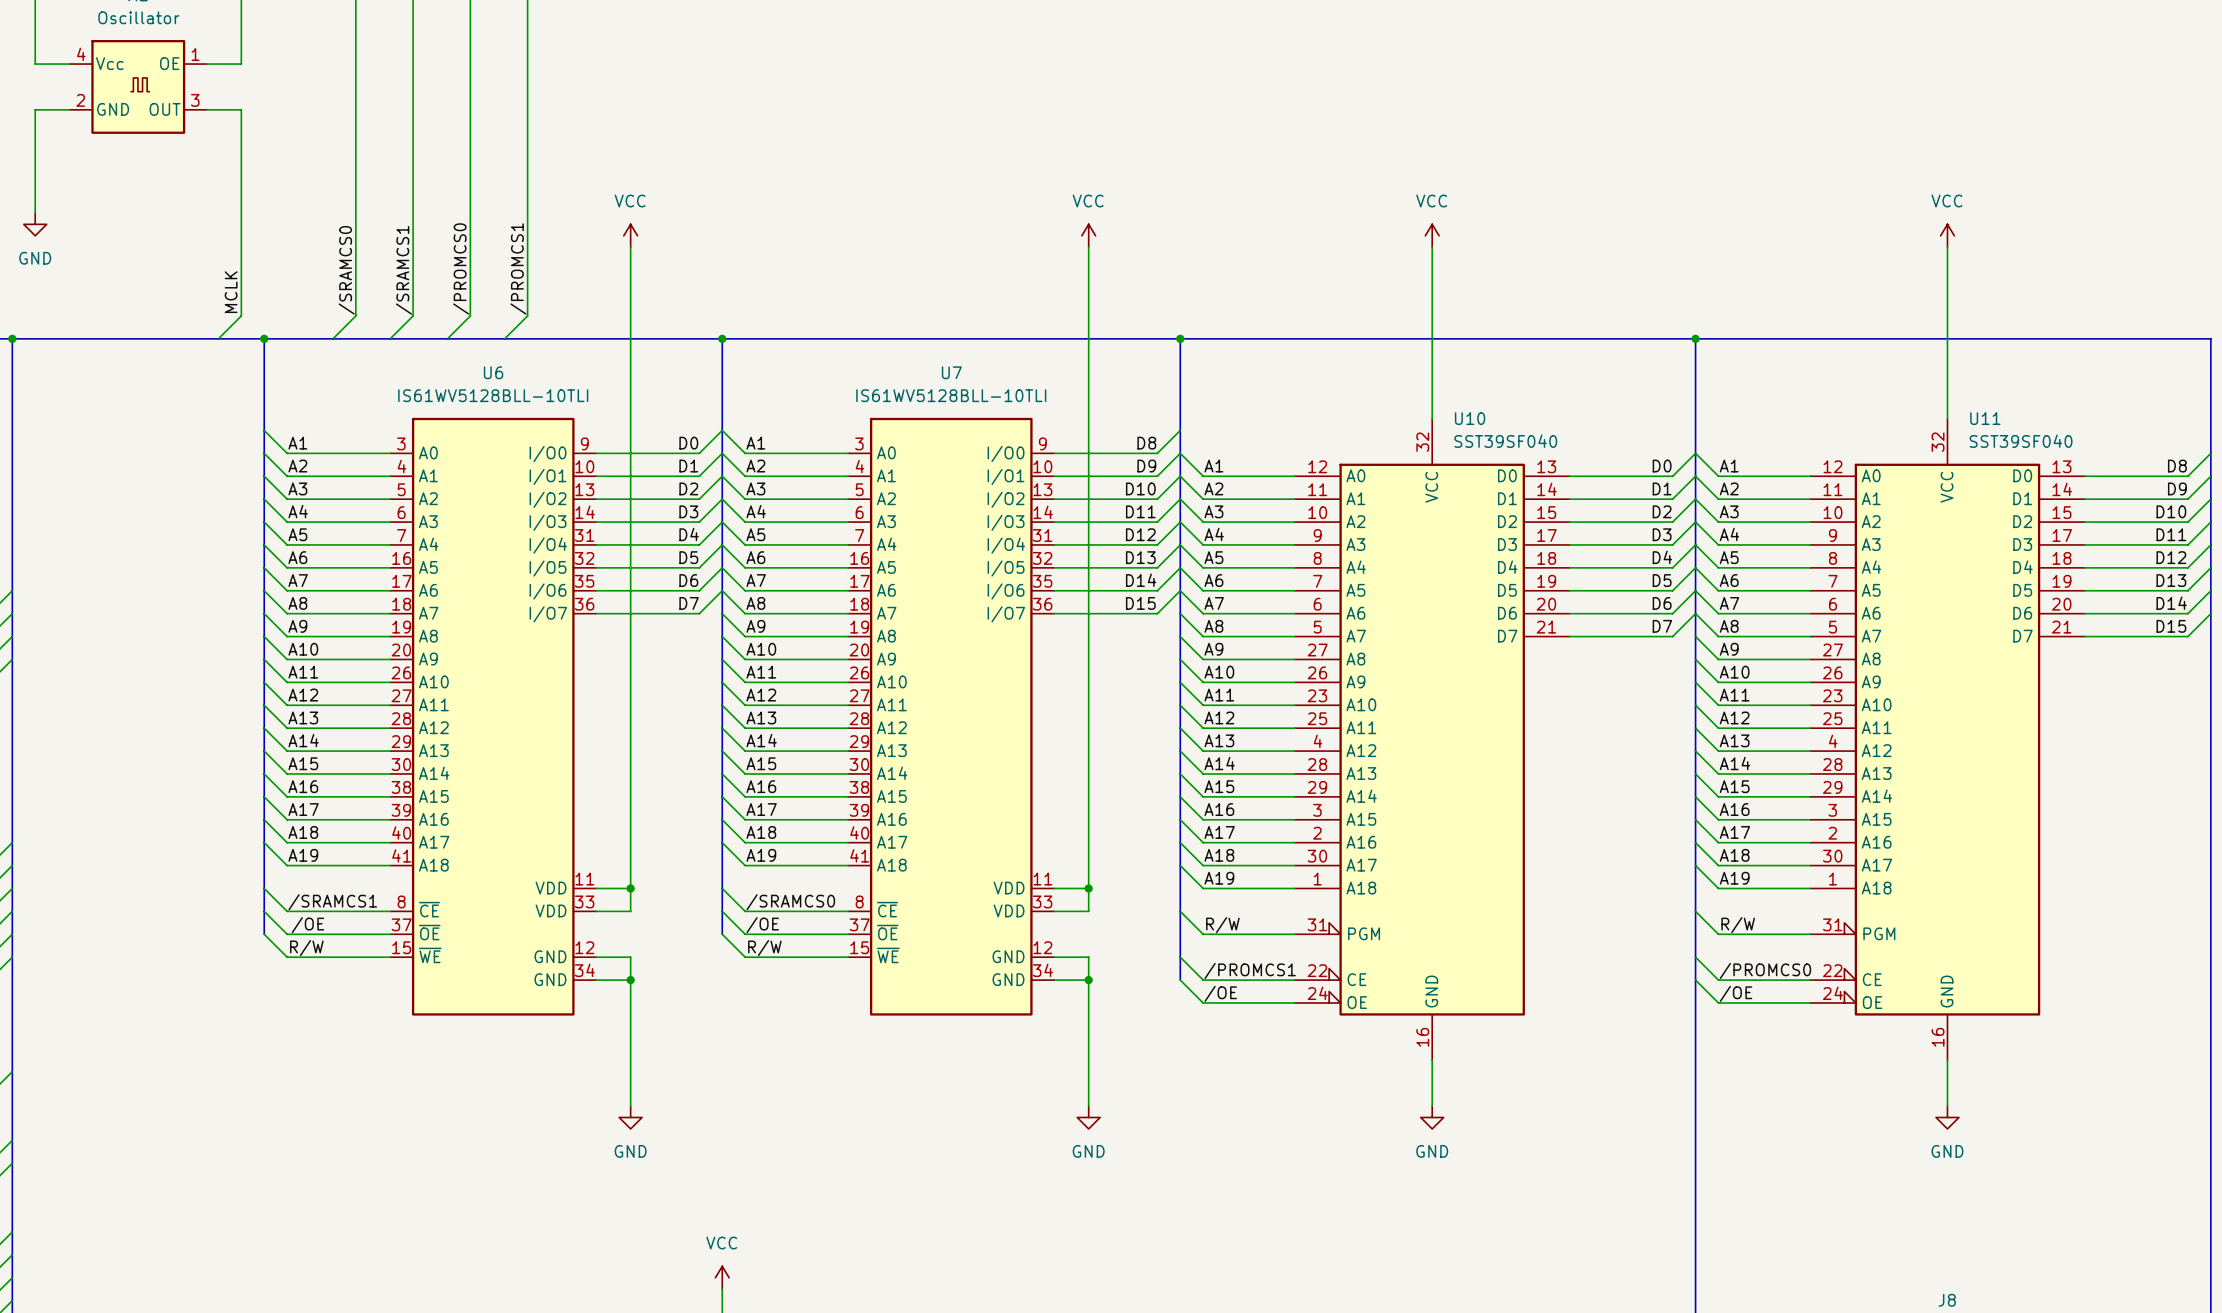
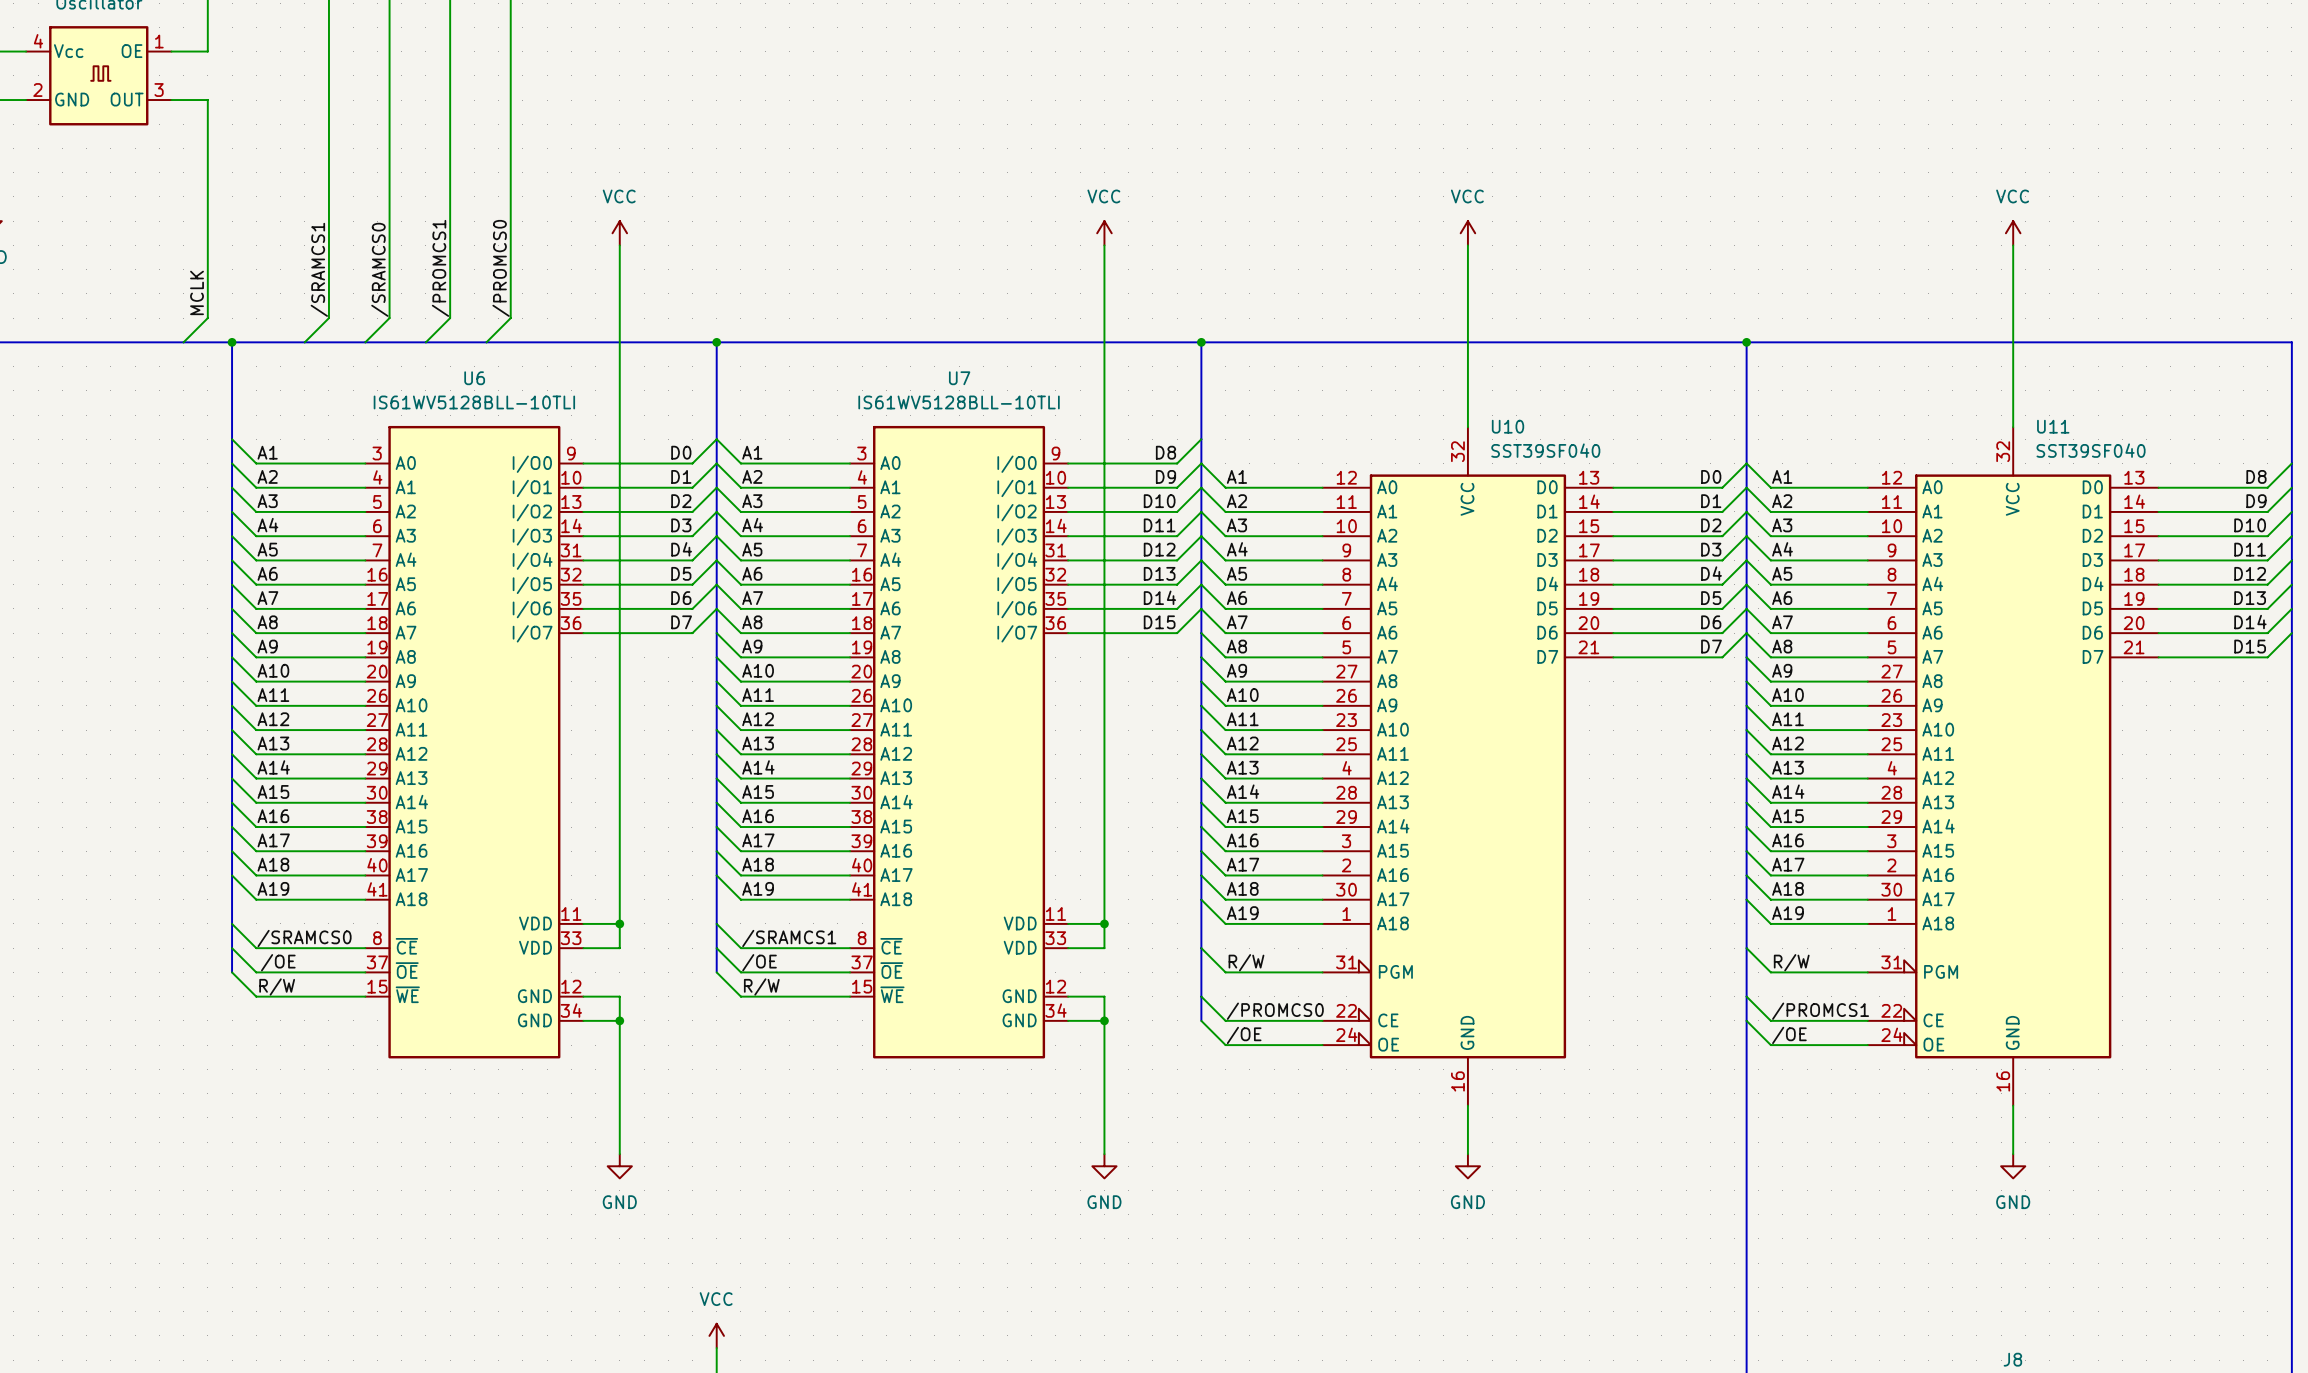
label: /PROMCS0 (461, 268) -> /PROMCS1 (440, 268)
label: /PROMCS1 (518, 268) -> /PROMCS0 (501, 268)
label: /SRAMCS0 (346, 270) -> /SRAMCS1 (319, 269)
label: /SRAMCS1 (403, 270) -> /SRAMCS0 (379, 269)
label: /SRAMCS1 (332, 902) -> /SRAMCS0 (304, 938)
label: /SRAMCS0 (790, 902) -> /SRAMCS1 (789, 938)
label: /PROMCS1 (1250, 970) -> /PROMCS0 (1275, 1011)
label: /PROMCS0 (1765, 970) -> /PROMCS1 (1820, 1011)

